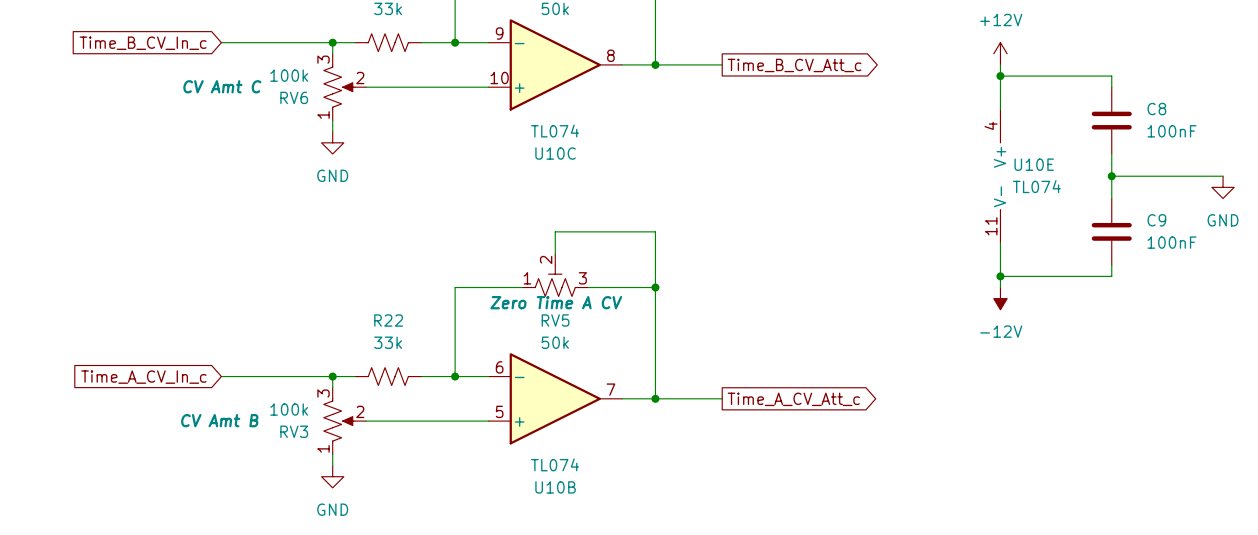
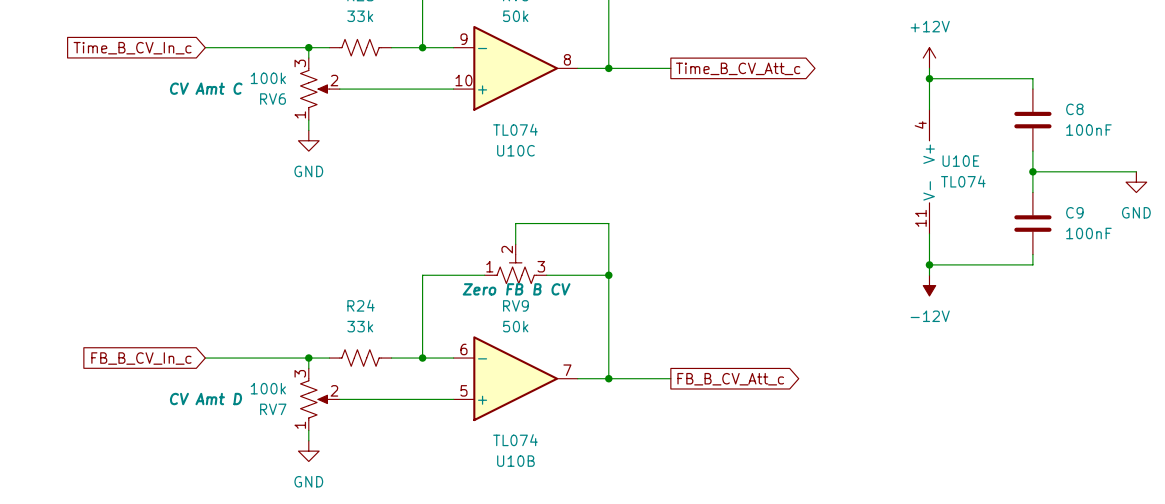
RV5 text: Zero Time A CV (556, 302) -> Zero FB B CV (516, 289)
R22 name: R22 (388, 320) -> R24 (361, 305)
RV5 name: RV5 (555, 320) -> RV9 (515, 305)
global label: Time_A_CV_In_c (143, 377) -> FB_B_CV_In_c (141, 358)
global label: Time_A_CV_Att_c (793, 399) -> FB_B_CV_Att_c (730, 379)
RV3 text: CV Amt B (219, 420) -> CV Amt D (206, 399)
RV3 name: RV3 (294, 431) -> RV7 (273, 409)

